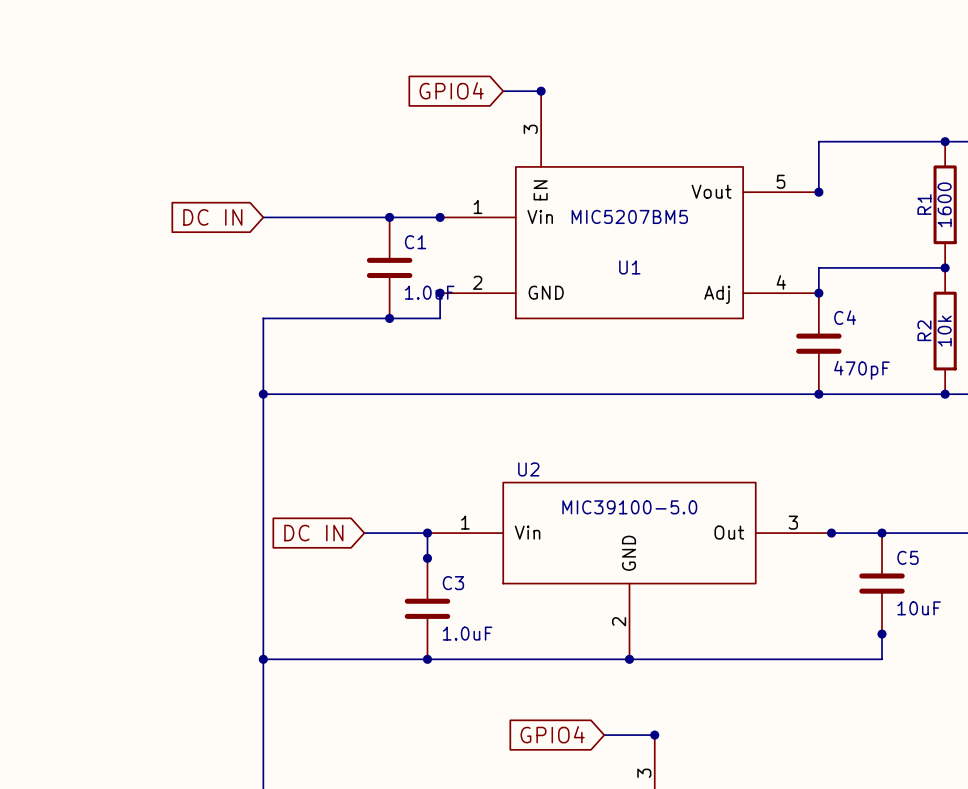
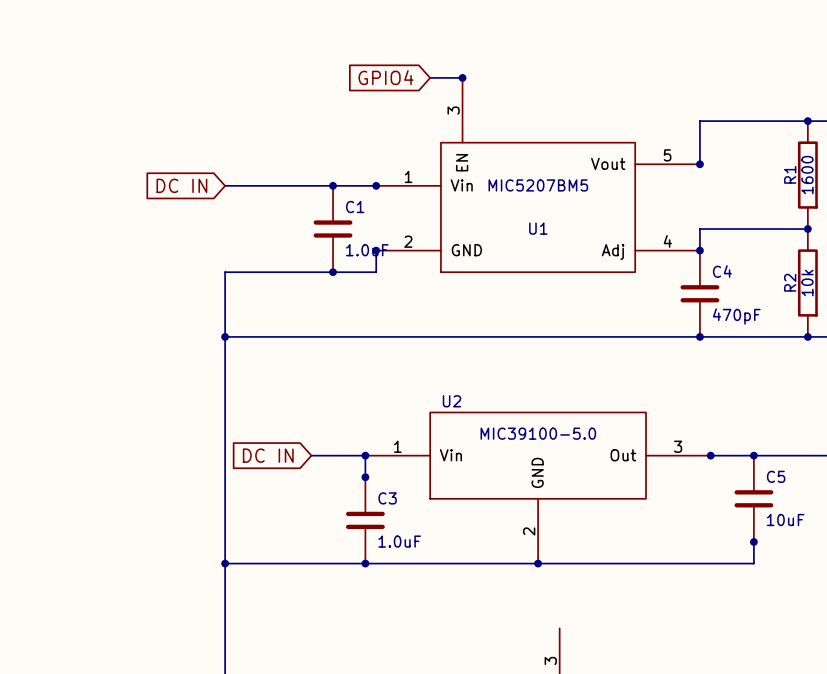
global label: GPIO4 (552, 734) -> none
wire: (604, 735) (654, 735) -> none
junction: (654, 735) -> none

